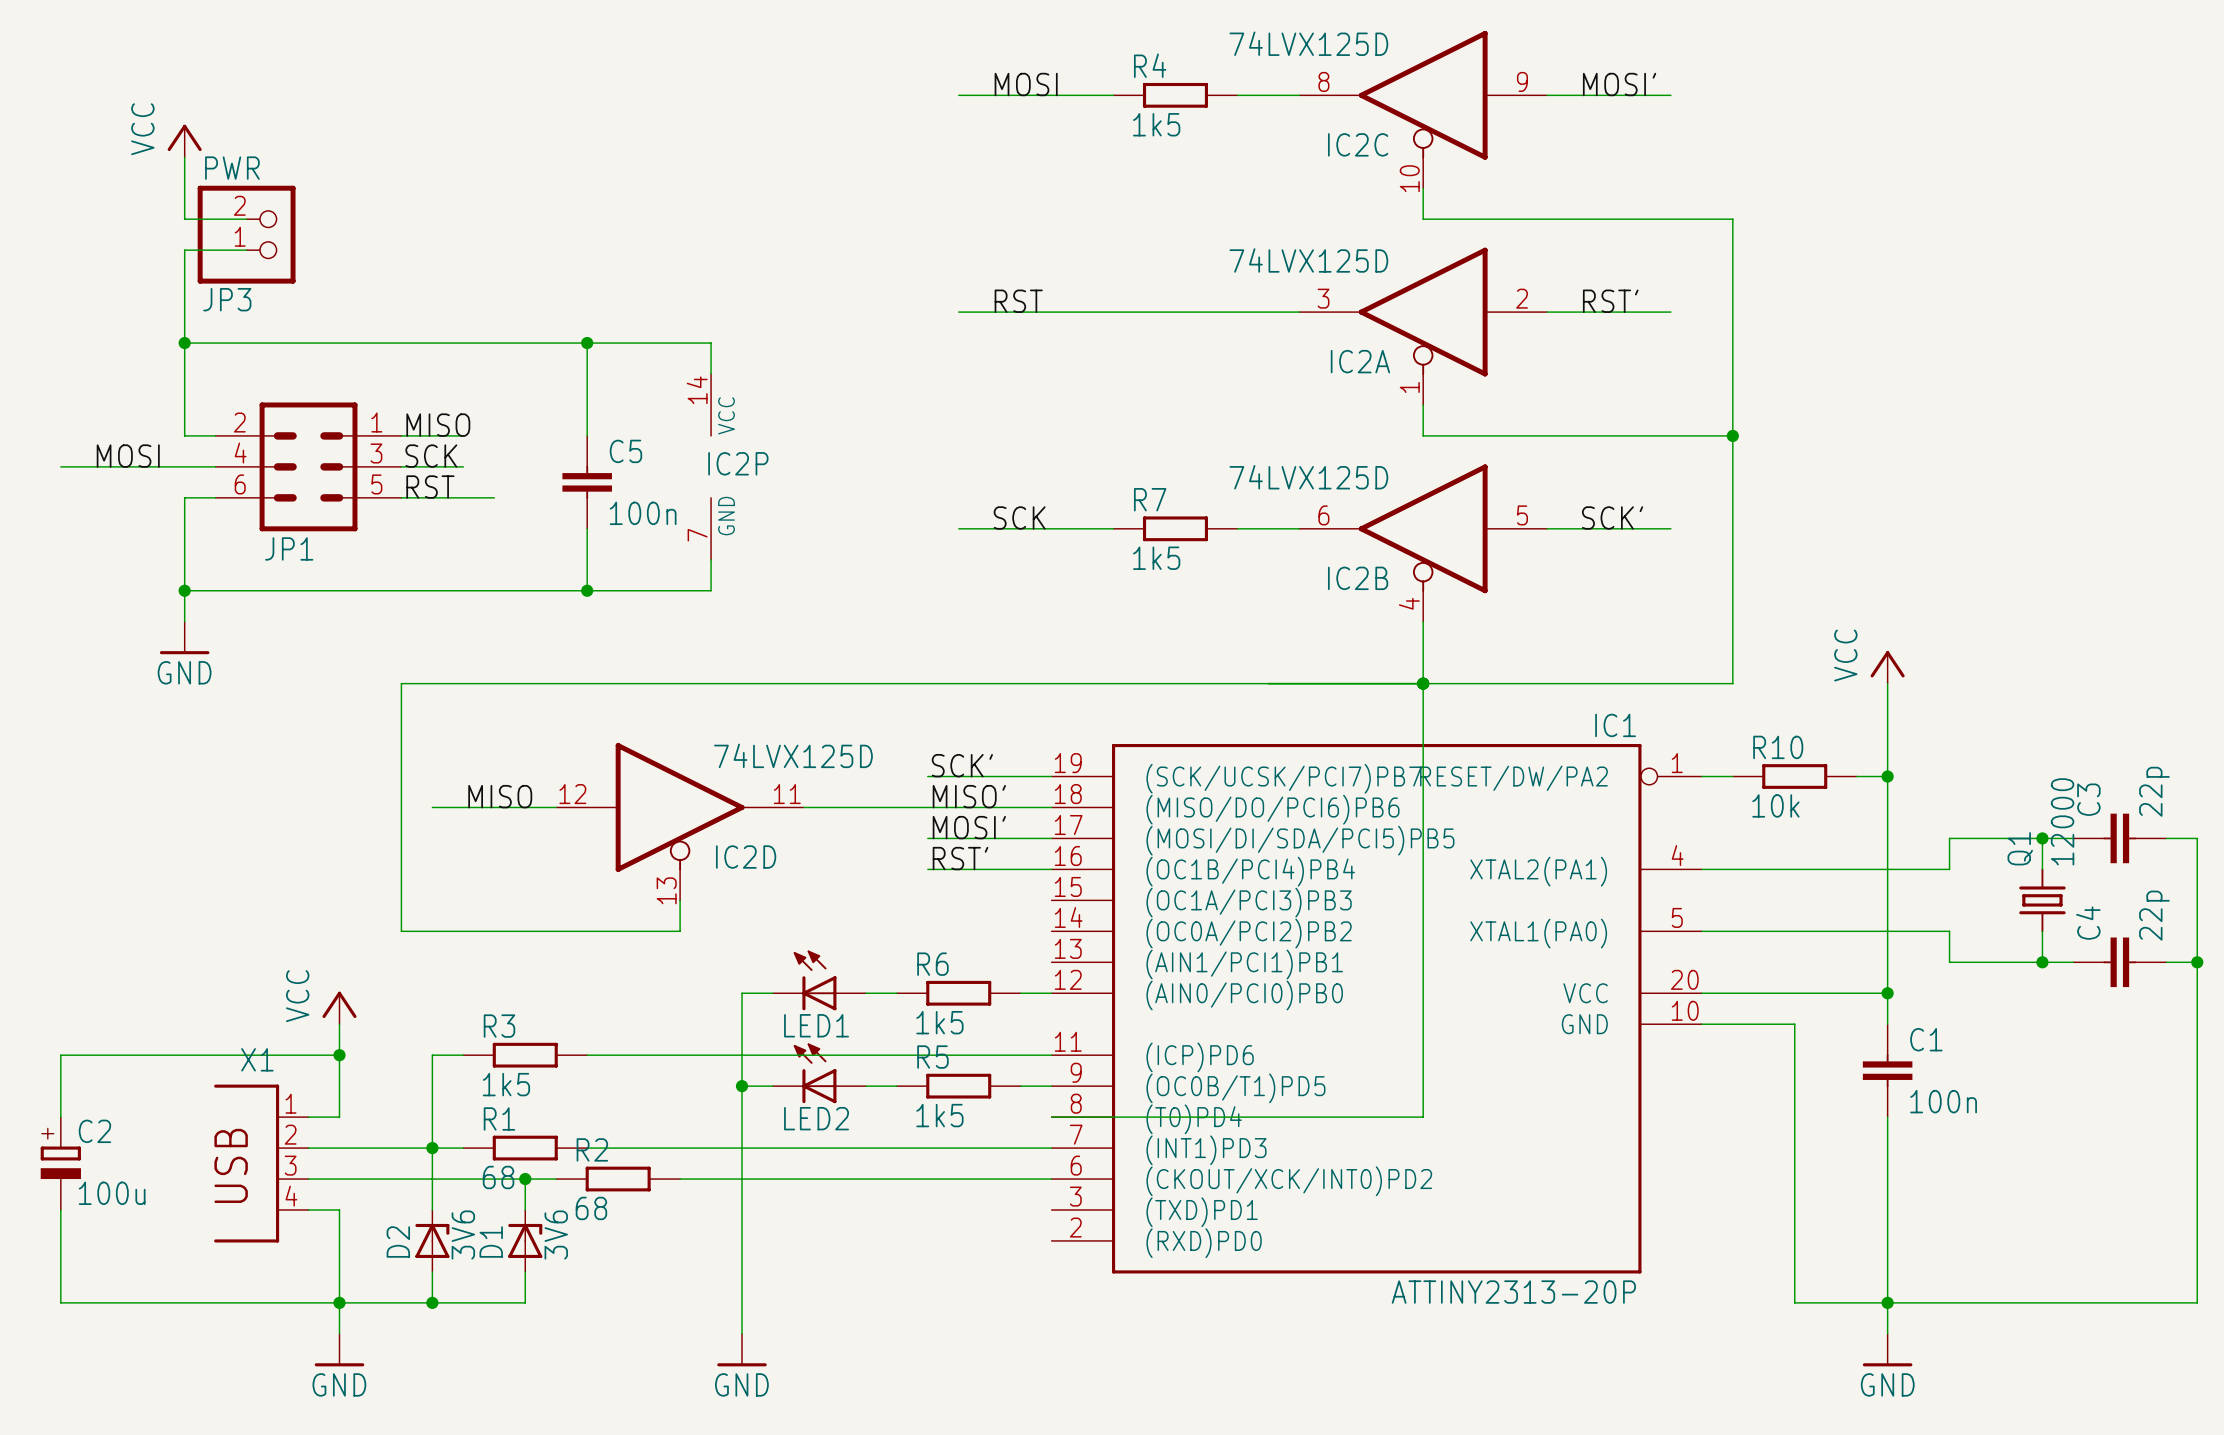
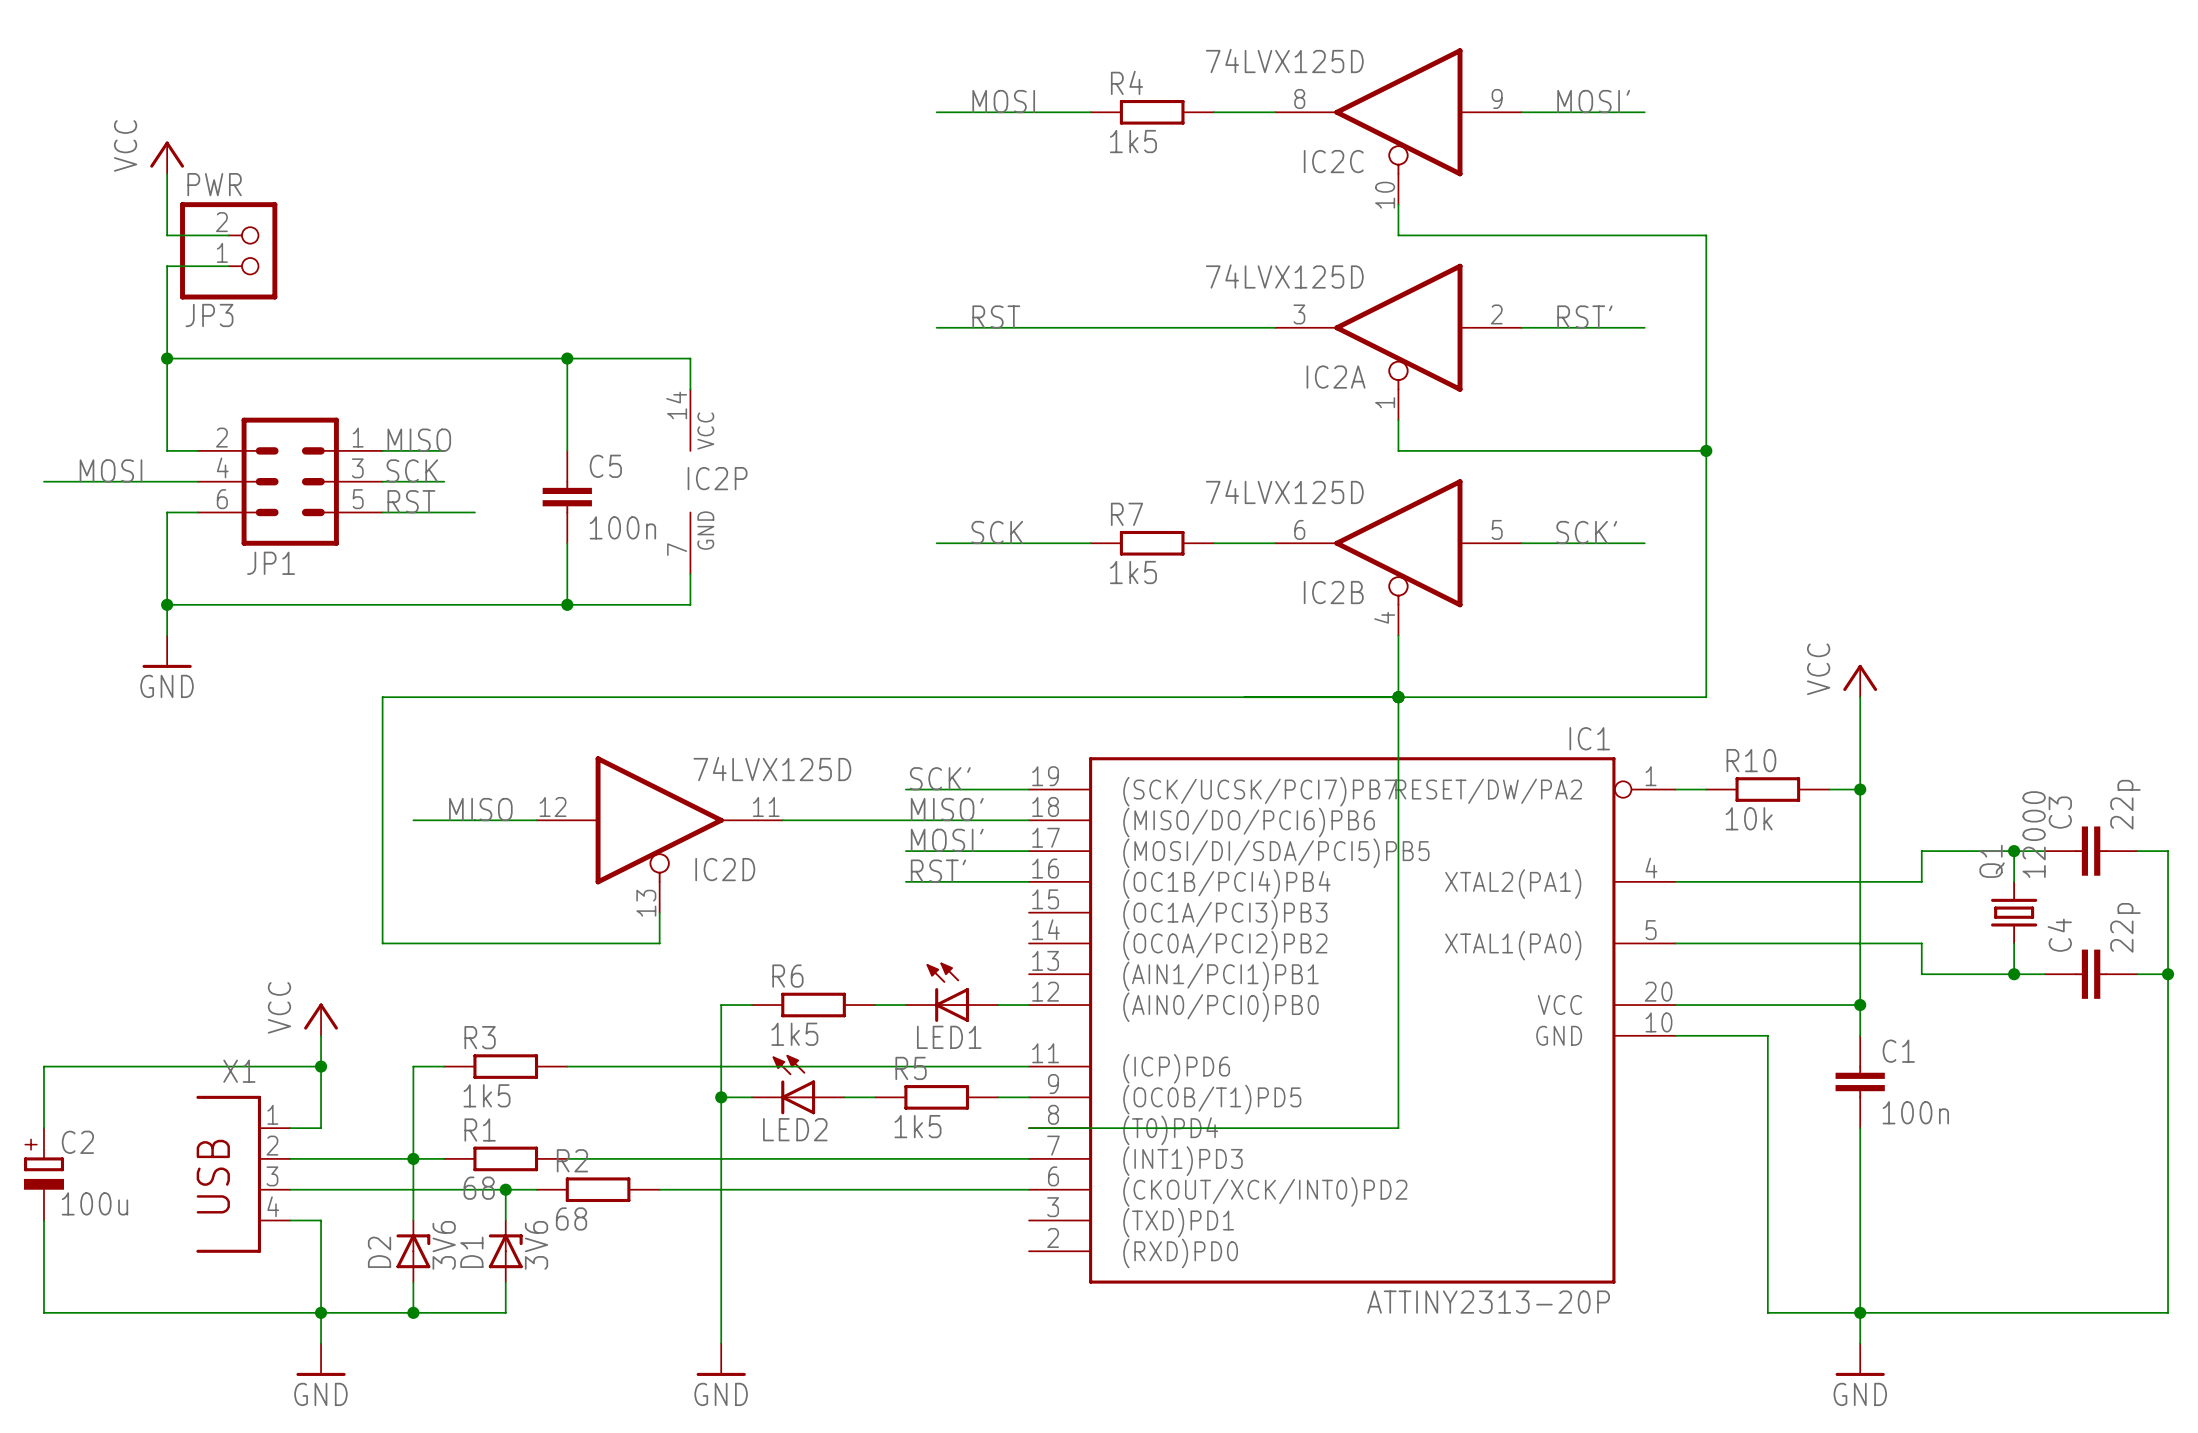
LED1 position: (819, 980) -> (952, 992)
R6 position: (958, 993) -> (813, 1005)

